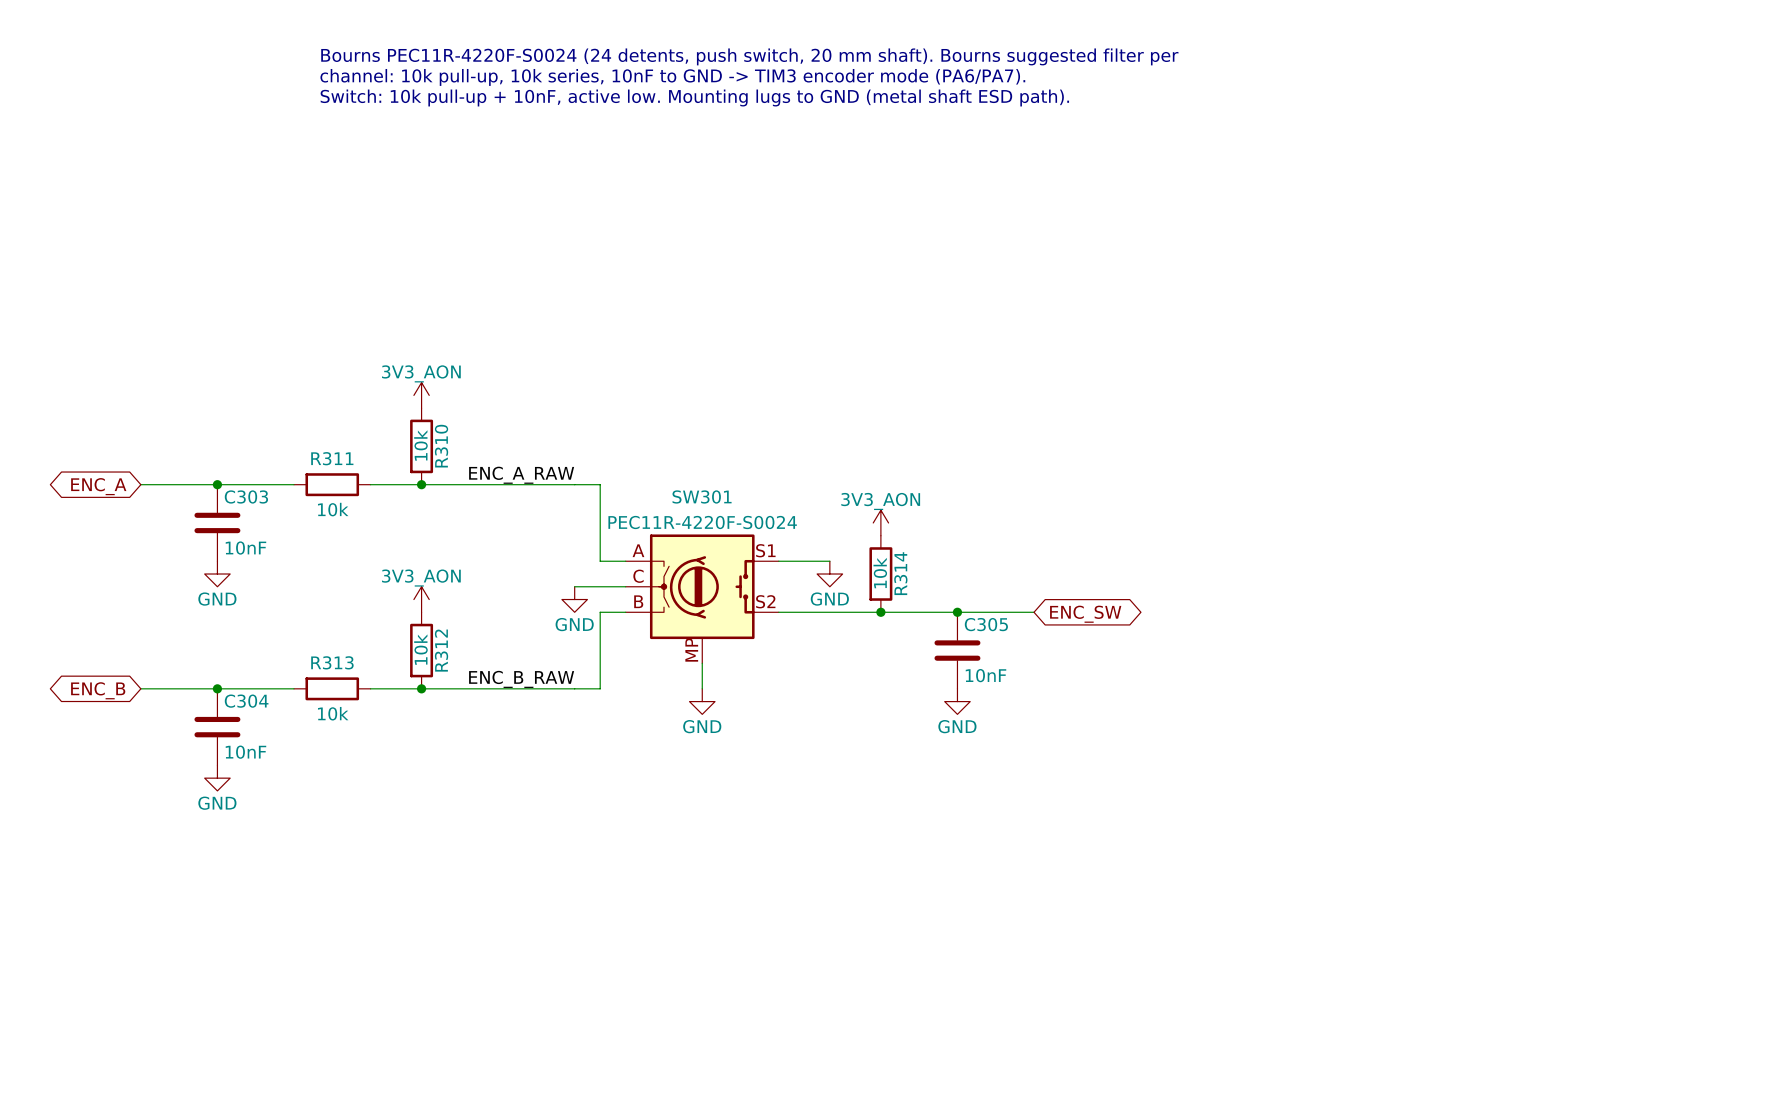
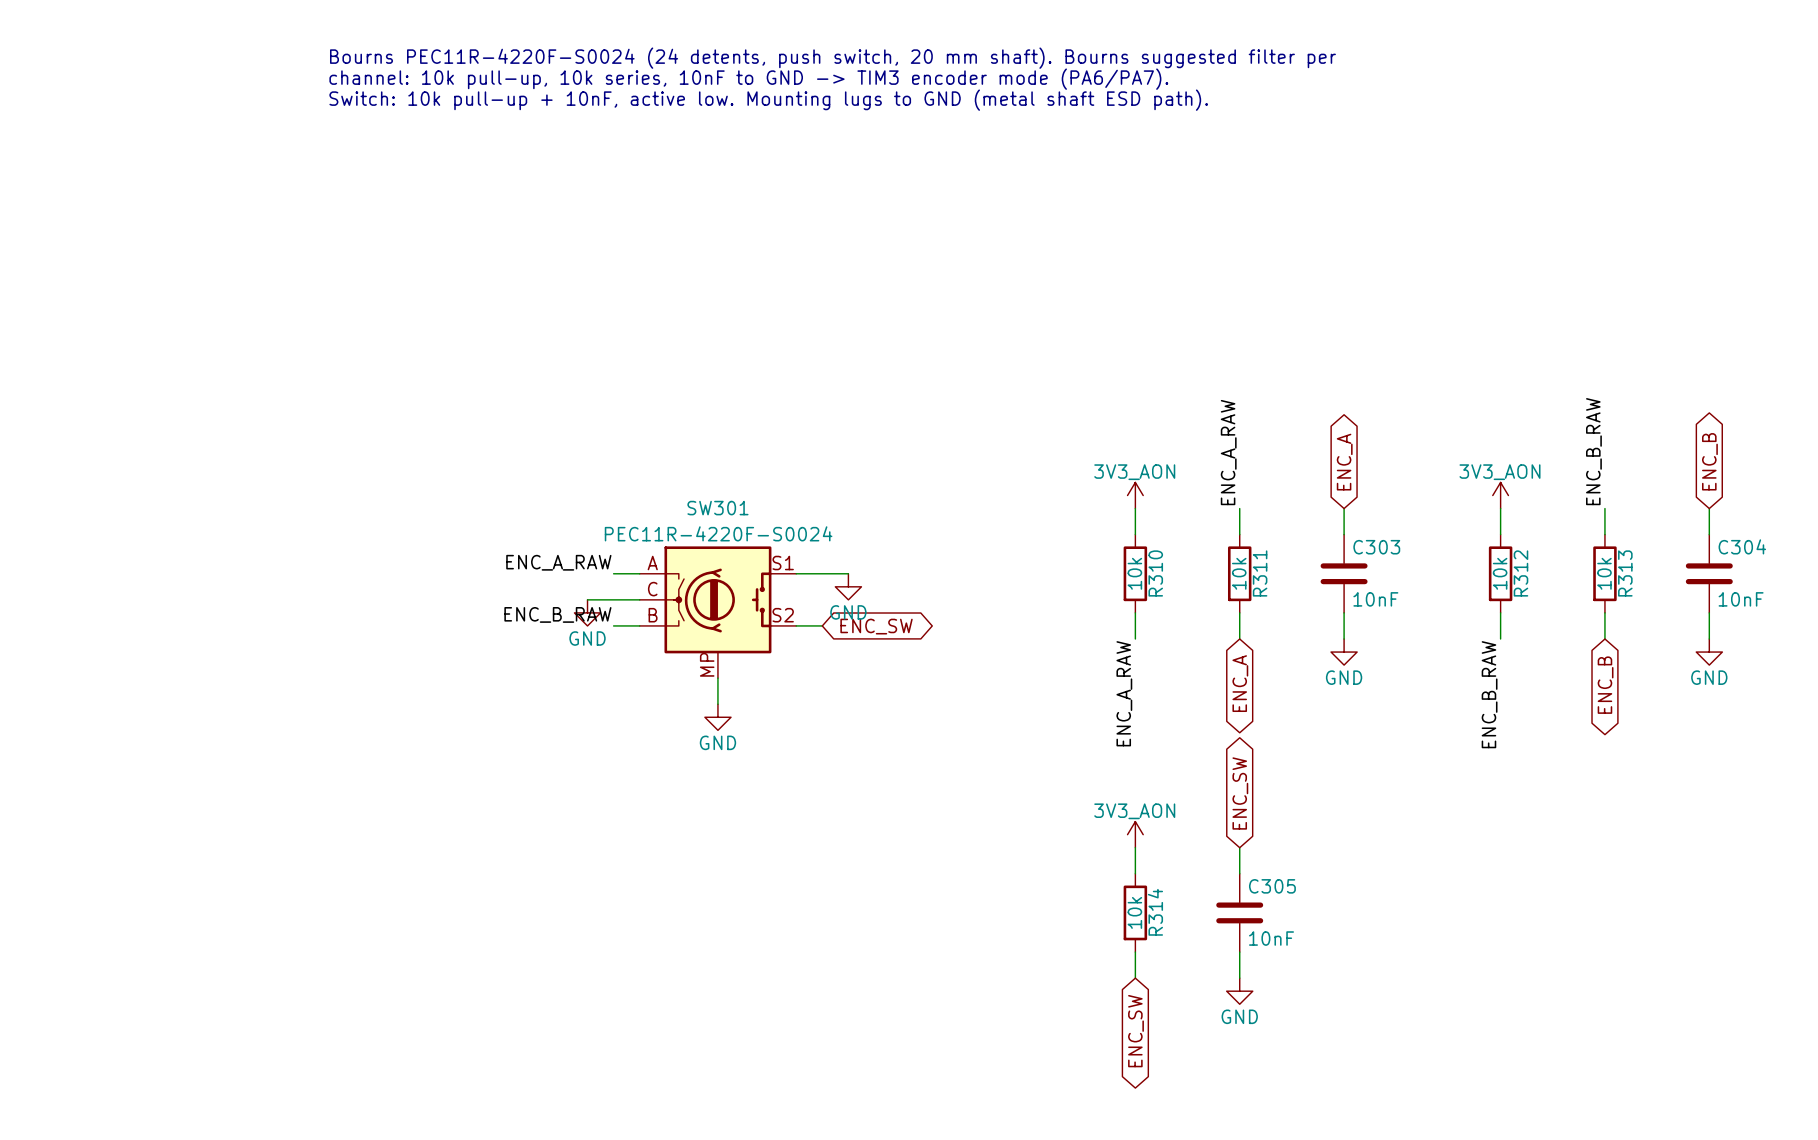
power symbol: 3V3_AON (421, 395) -> none
label: none -> ENC_A_RAW (1228, 452)
label: none -> ENC_B_RAW (1593, 451)
R310 position: (421, 446) -> (1135, 573)
global label: none -> ENC_A (1344, 462)
global label: none -> ENC_B (1709, 461)
label position: ENC_A_RAW (521, 475) -> ENC_A_RAW (558, 562)
wire: (140, 484) (293, 484) -> none
junction: (217, 484) -> none
R311 rotation: 0° (332, 484) -> 90° clockwise (1239, 573)
R311 position: (332, 484) -> (1239, 573)
wire: (370, 484) (600, 484) (600, 561) -> none
junction: (421, 484) -> none
power symbol: none -> 3V3_AON (1135, 495)
power symbol: none -> 3V3_AON (1500, 495)
global label: ENC_A (98, 486) -> none
wire: none -> (1135, 508) (1135, 534)
wire: none -> (1239, 508) (1239, 534)
wire: none -> (1344, 508) (1344, 534)
wire: none -> (1500, 508) (1500, 534)
wire: none -> (1604, 508) (1604, 534)
wire: none -> (1709, 508) (1709, 534)
R311 value position: 10k (333, 509) -> 10k (1239, 573)
C303 position: (217, 522) -> (1344, 573)
power symbol: 3V3_AON (880, 522) -> none
power symbol: GND (217, 574) -> none
R314 position: (880, 574) -> (1135, 912)
power symbol: 3V3_AON (421, 599) -> none
wire: none -> (1135, 612) (1135, 639)
wire: none -> (1239, 612) (1239, 639)
wire: none -> (1344, 612) (1344, 639)
wire: none -> (1500, 612) (1500, 639)
wire: none -> (1604, 612) (1604, 639)
wire: none -> (1709, 612) (1709, 639)
wire: (600, 612) (600, 688) (370, 688) -> none
wire: (804, 612) (1034, 612) -> none
junction: (880, 612) -> none
junction: (957, 612) -> none
global label: none -> ENC_SW (876, 626)
global label: ENC_SW (1085, 614) -> none
power symbol: none -> GND (1344, 652)
power symbol: none -> GND (1709, 652)
R312 position: (421, 650) -> (1500, 573)
C305 position: (957, 650) -> (1239, 912)
global label: none -> ENC_A (1240, 683)
global label: none -> ENC_B (1605, 685)
label: none -> ENC_A_RAW (1124, 693)
label: none -> ENC_B_RAW (1489, 694)
label position: ENC_B_RAW (521, 679) -> ENC_B_RAW (557, 614)
wire: (140, 688) (293, 688) -> none
junction: (217, 688) -> none
R313 rotation: 0° (332, 688) -> 90° clockwise (1604, 573)
R313 position: (332, 688) -> (1604, 573)
junction: (421, 688) -> none
global label: ENC_B (98, 690) -> none
power symbol: GND (957, 701) -> none
R313 value position: 10k (333, 713) -> 10k (1604, 573)
C304 position: (217, 727) -> (1709, 573)
global label: none -> ENC_SW (1240, 793)
power symbol: GND (217, 778) -> none
power symbol: none -> 3V3_AON (1135, 834)
wire: none -> (1135, 847) (1135, 873)
wire: none -> (1239, 847) (1239, 873)
wire: none -> (1135, 952) (1135, 978)
wire: none -> (1239, 952) (1239, 978)
power symbol: none -> GND (1239, 991)
global label: none -> ENC_SW (1135, 1031)

